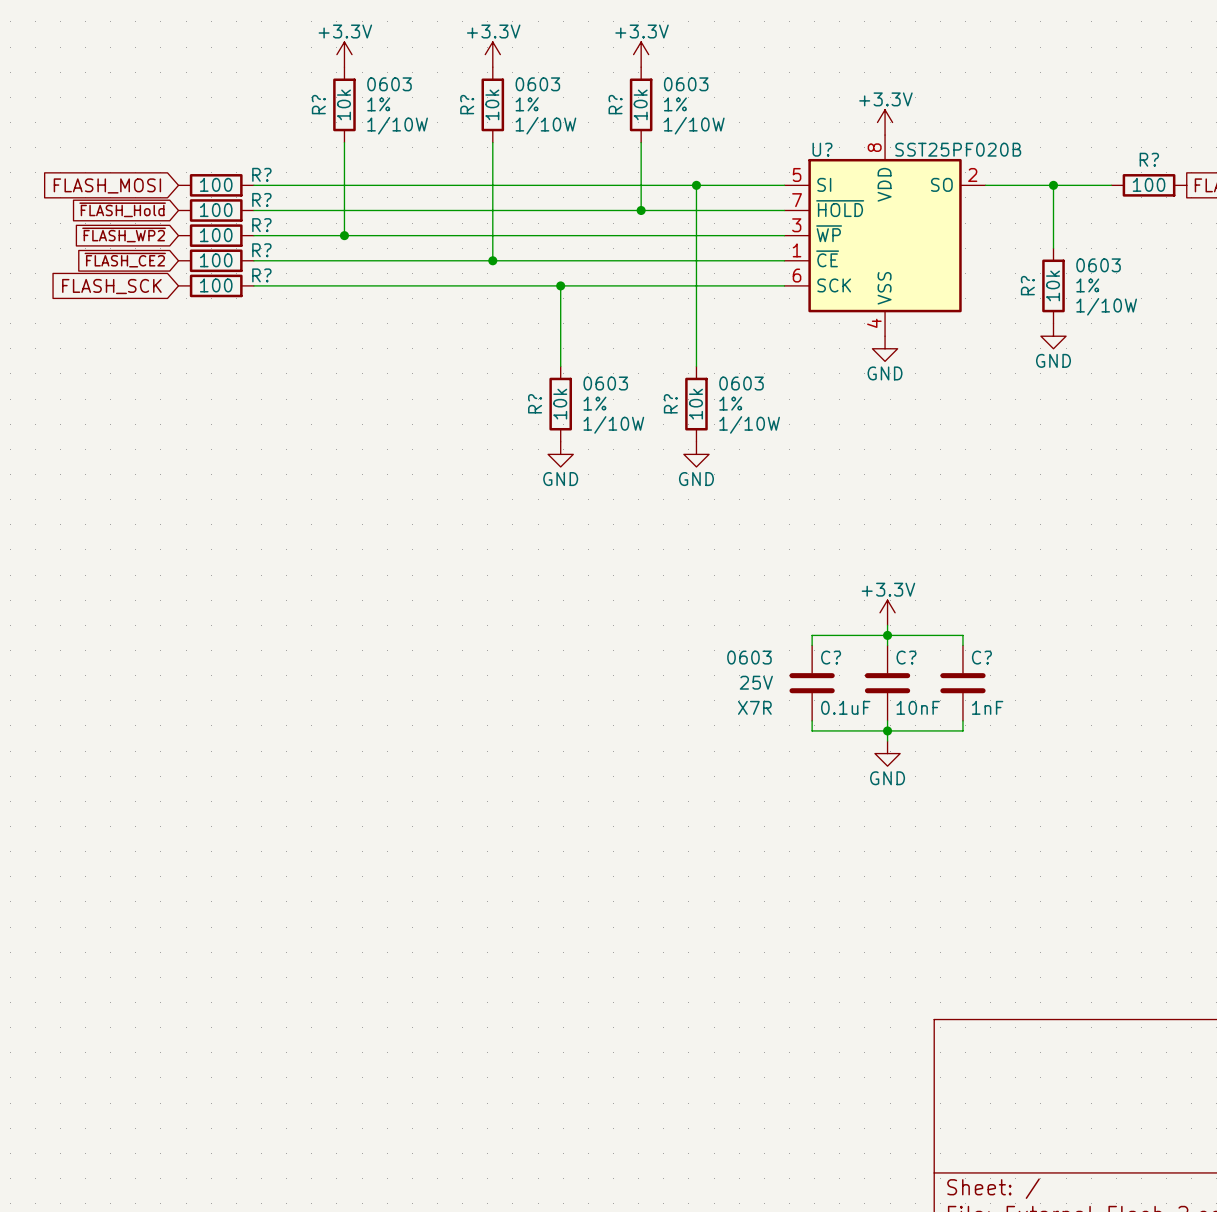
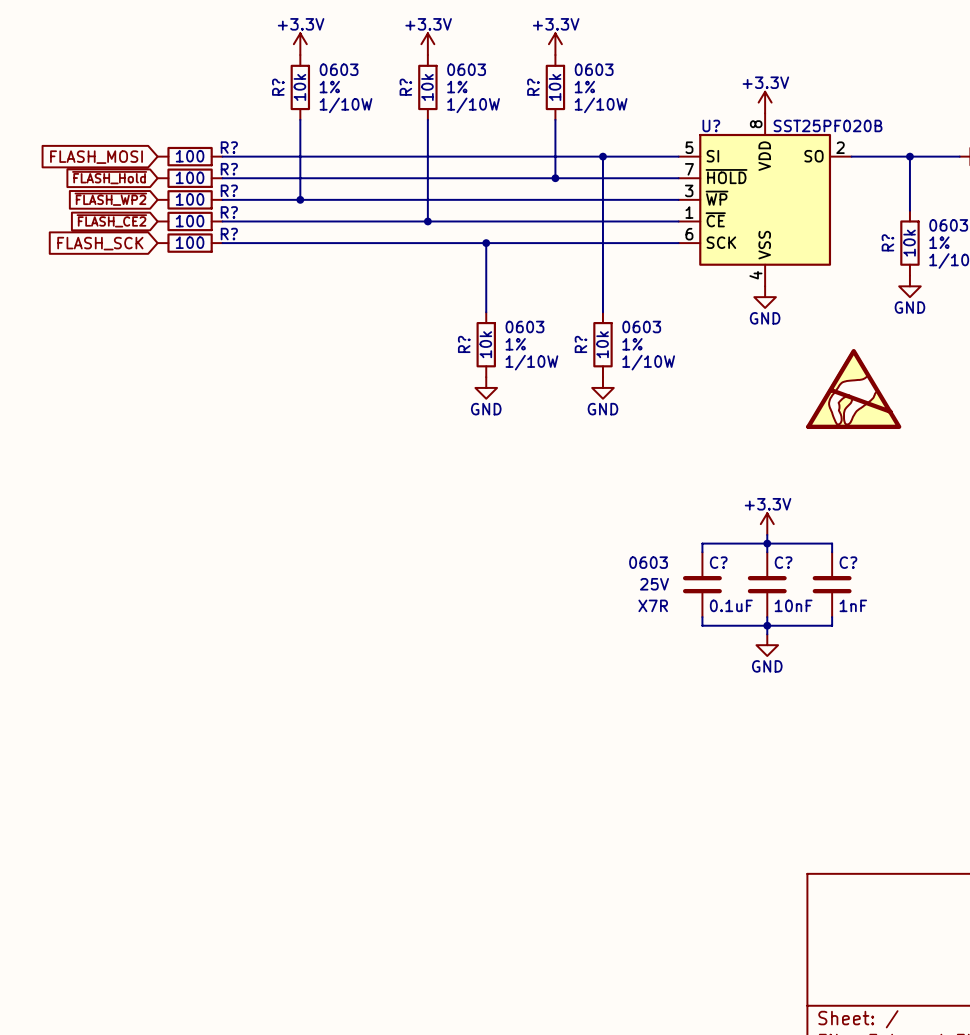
power symbol: none -> (853, 389)

